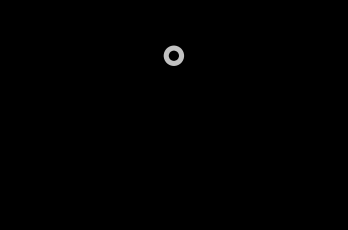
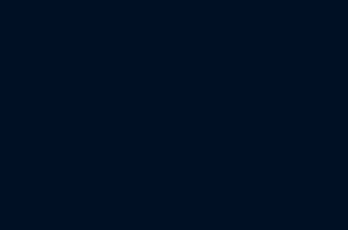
via: (173, 55) -> none

